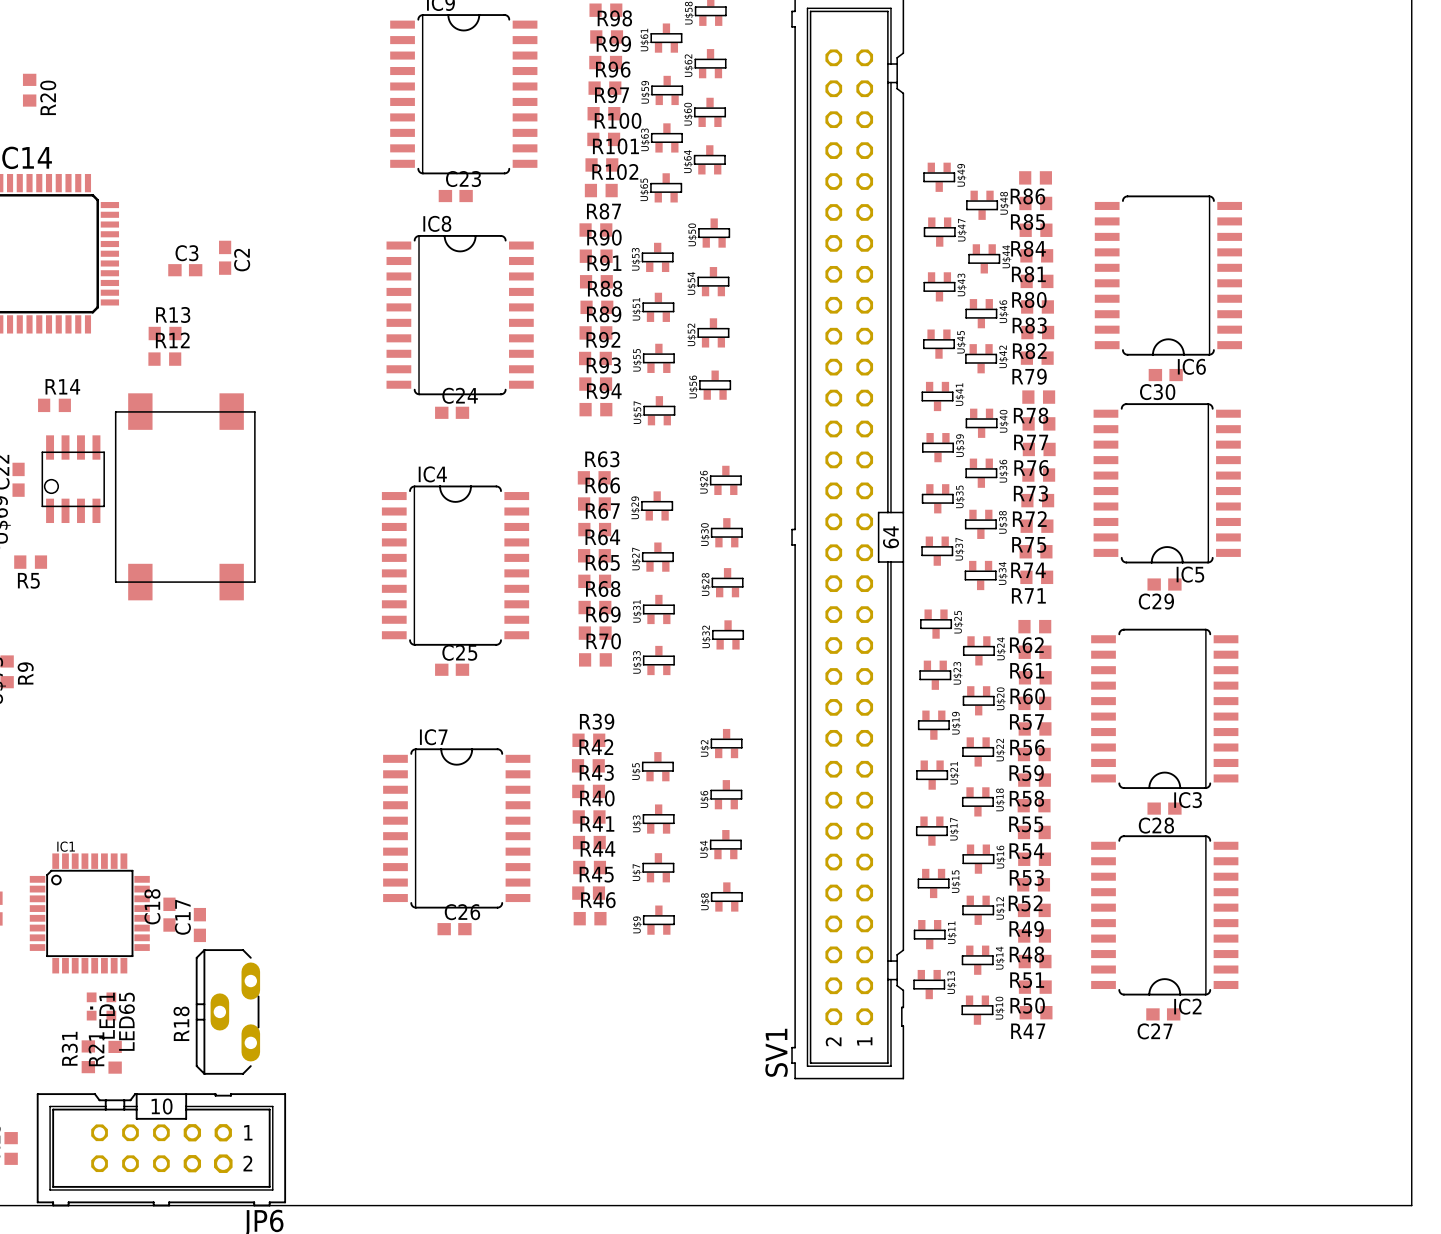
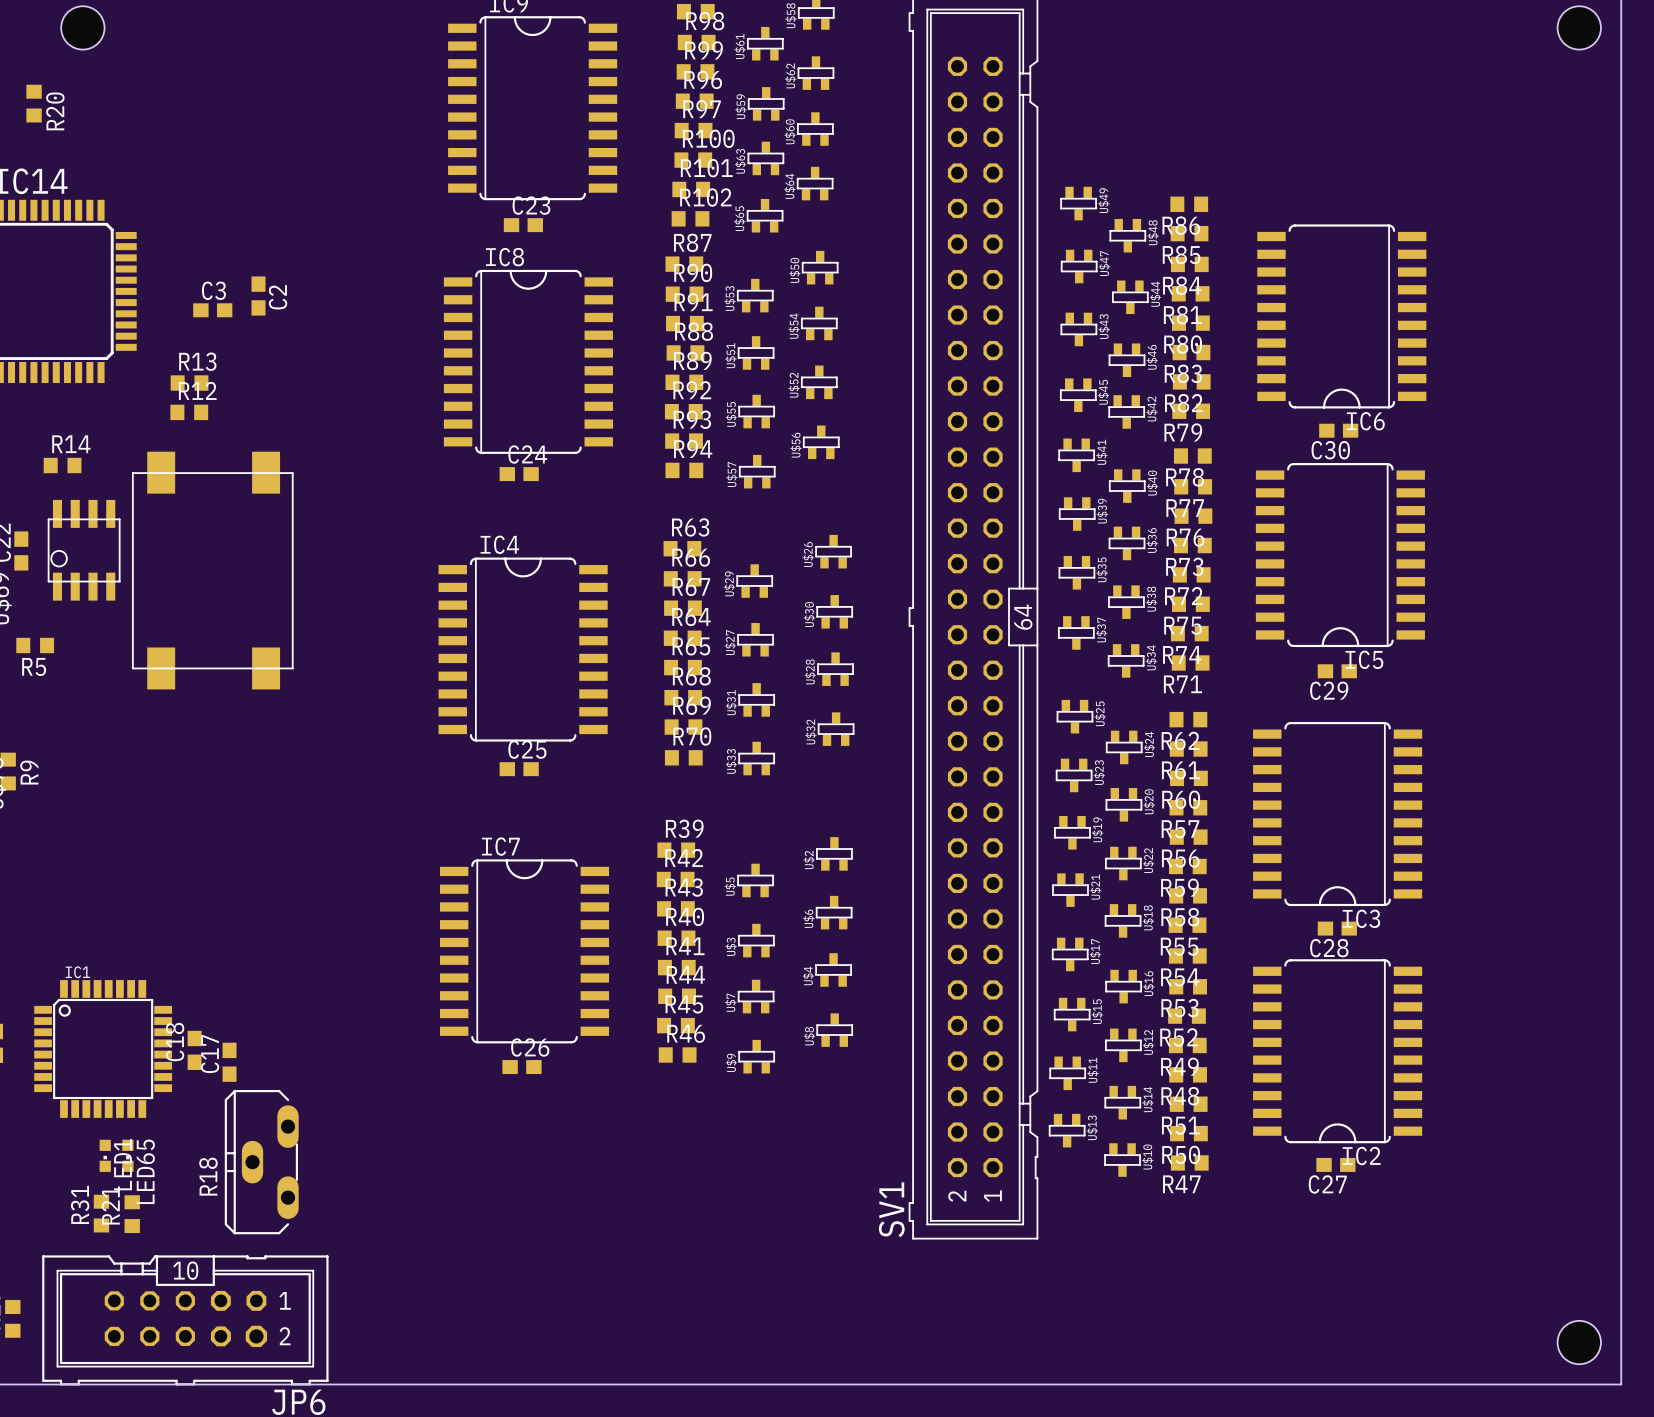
hole: none -> (82, 27)
hole: none -> (1579, 27)
hole: none -> (1579, 1342)

